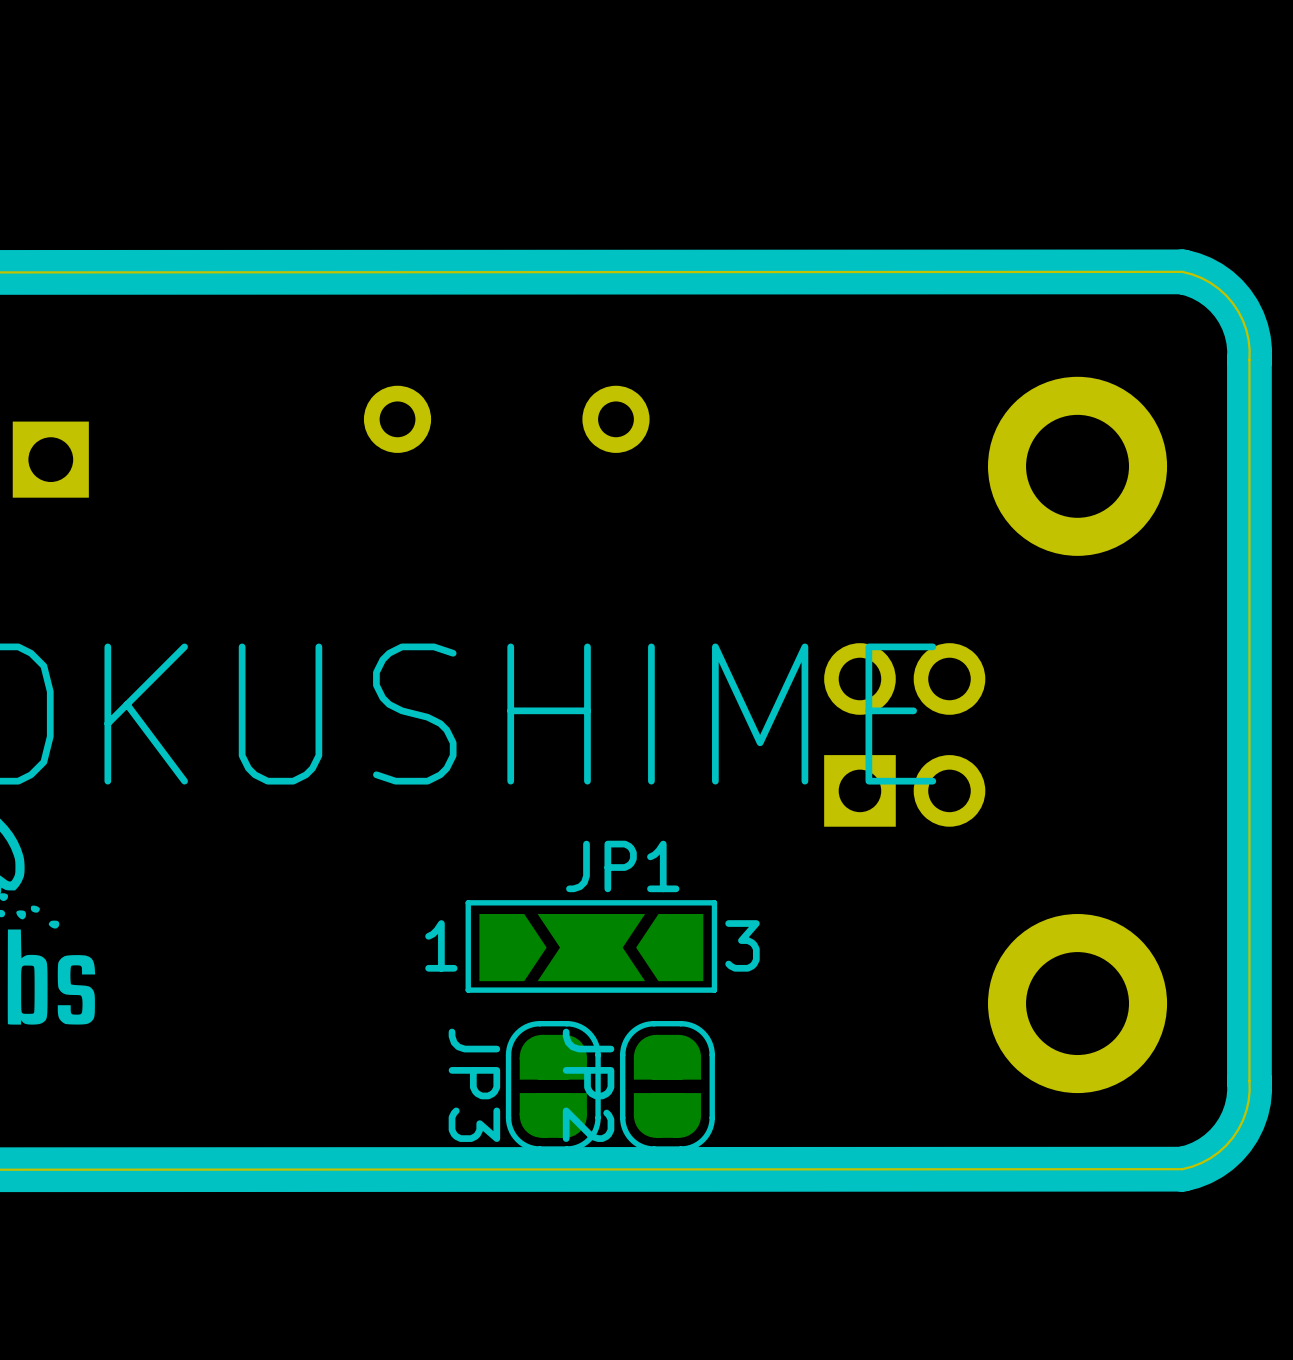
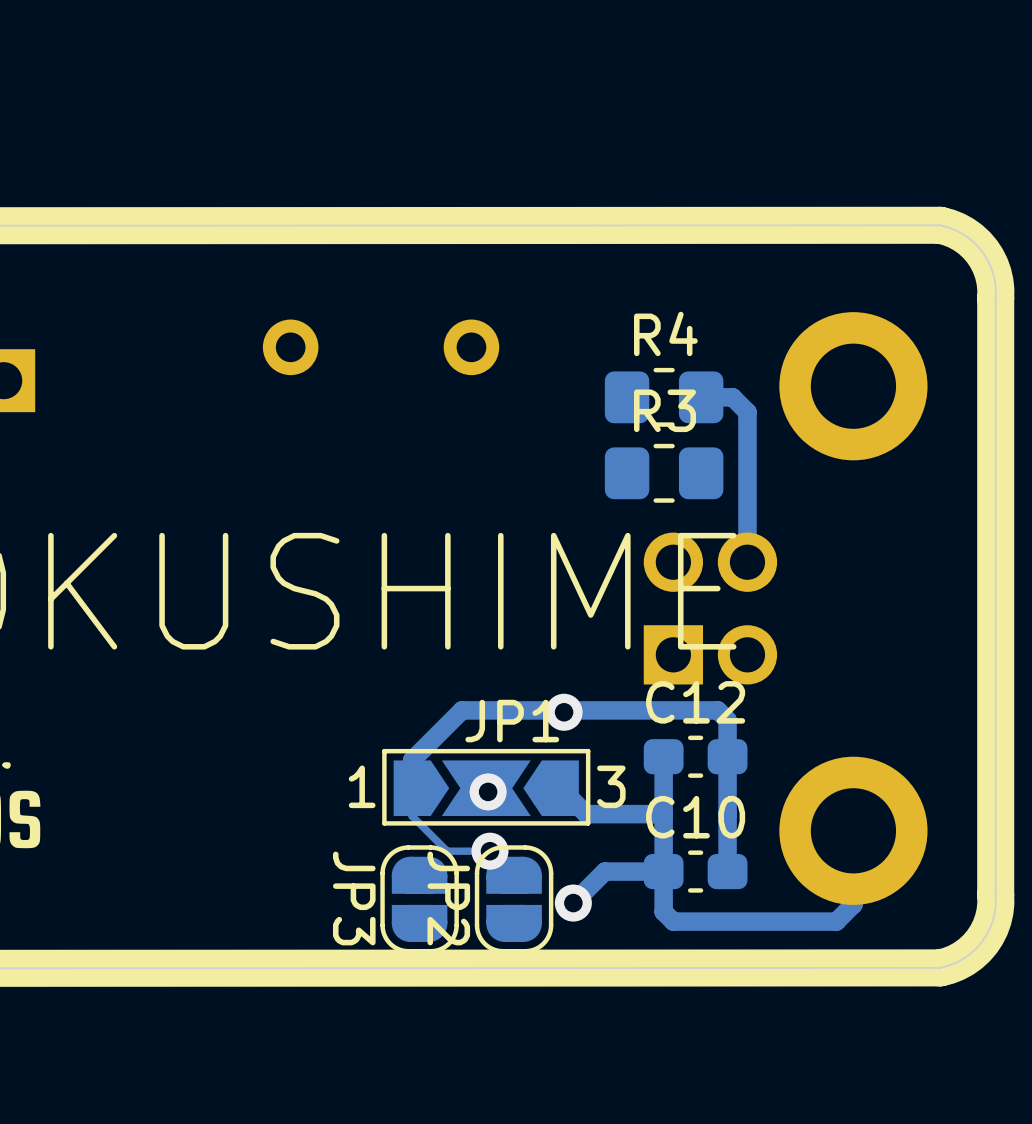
R4: none -> (664, 397)
track: none -> (701, 397) (732, 397) (747, 412) (747, 562)
R3: none -> (664, 473)
via: none -> (564, 712)
track: none -> (663, 756) (663, 911) (673, 921) (836, 921) (853, 904) (853, 830)
C12: none -> (695, 756)
JP1 position: (591, 946) -> (486, 787)
track: none -> (560, 788) (586, 814) (663, 814)
via: none -> (488, 791)
track: none -> (489, 851) (447, 851) (412, 816) (412, 760) (462, 710) (717, 710) (727, 720) (727, 871)
via: none -> (489, 851)
track: none -> (663, 871) (604, 871) (573, 903)
C10: none -> (695, 871)
via: none -> (573, 903)

